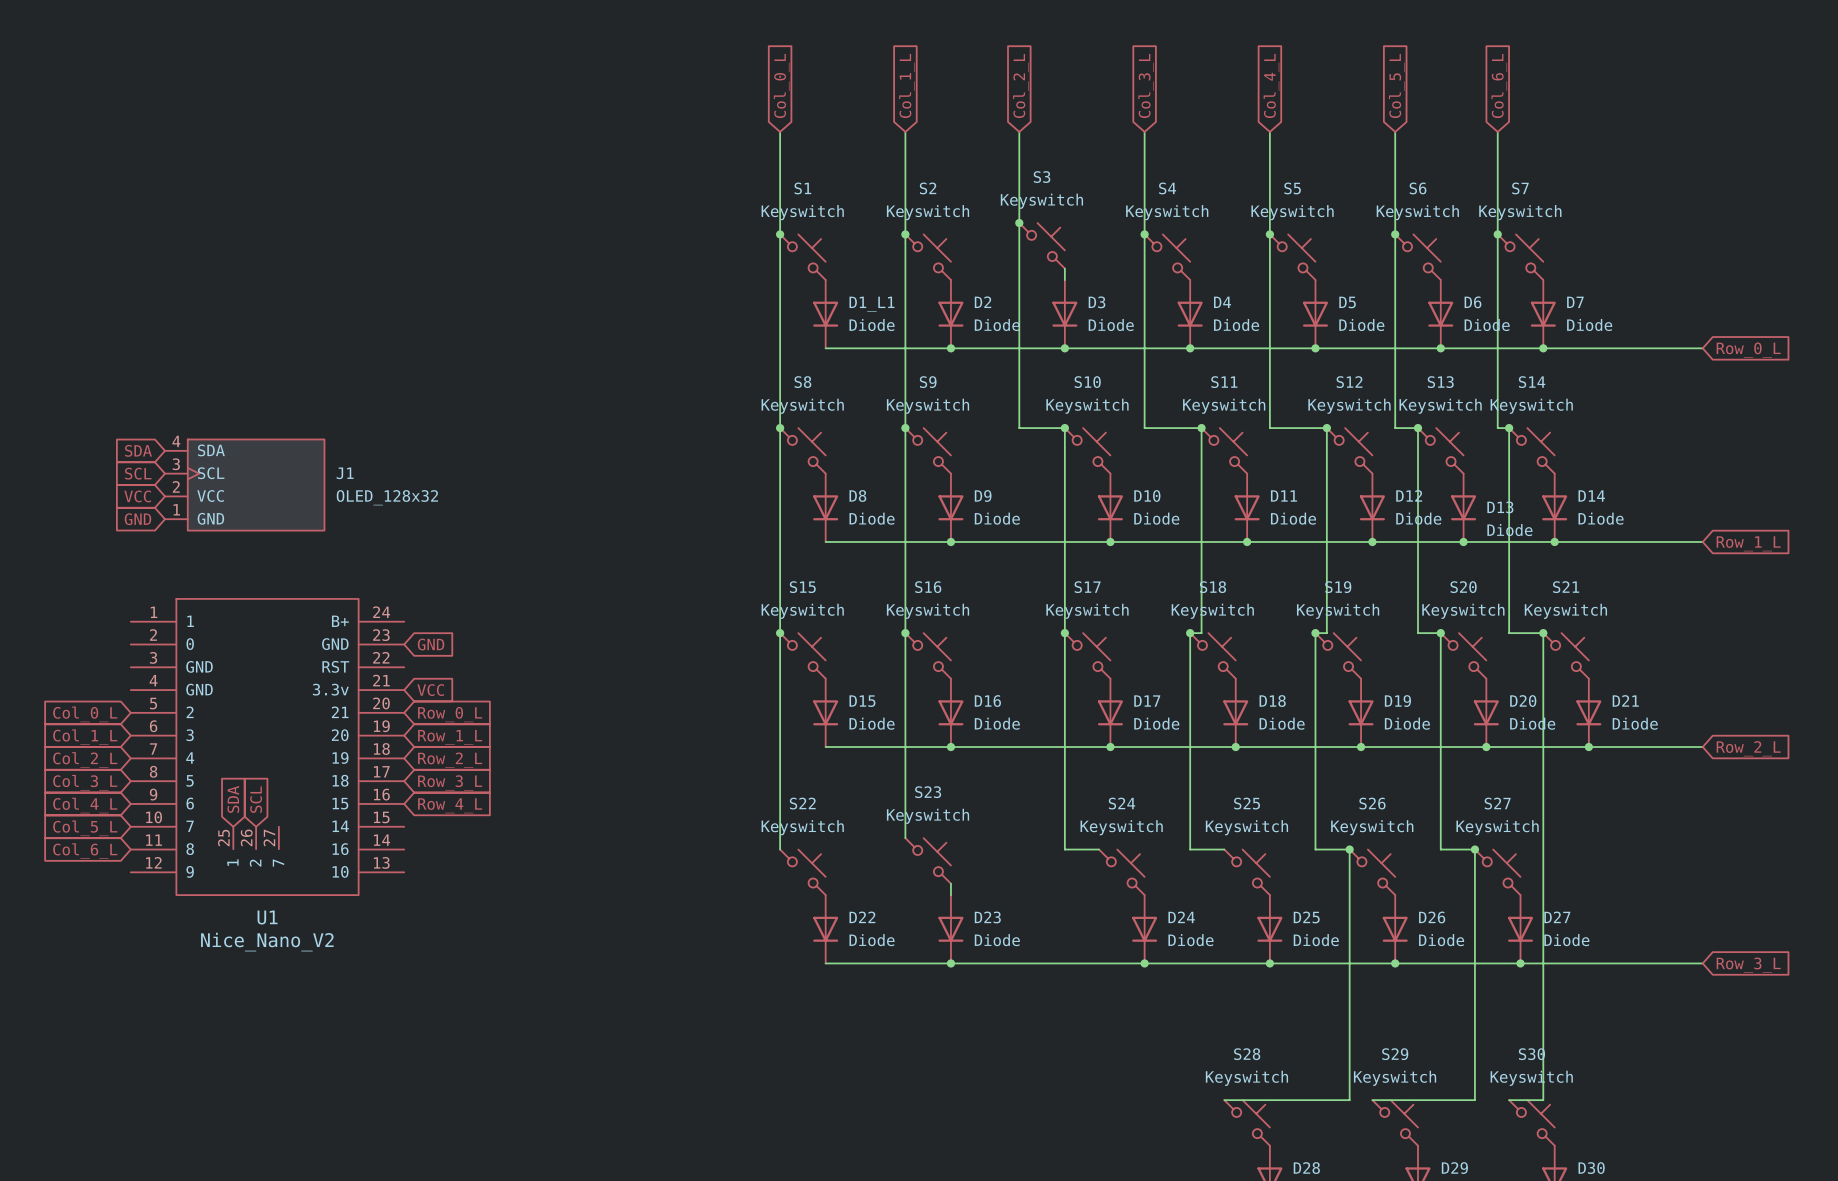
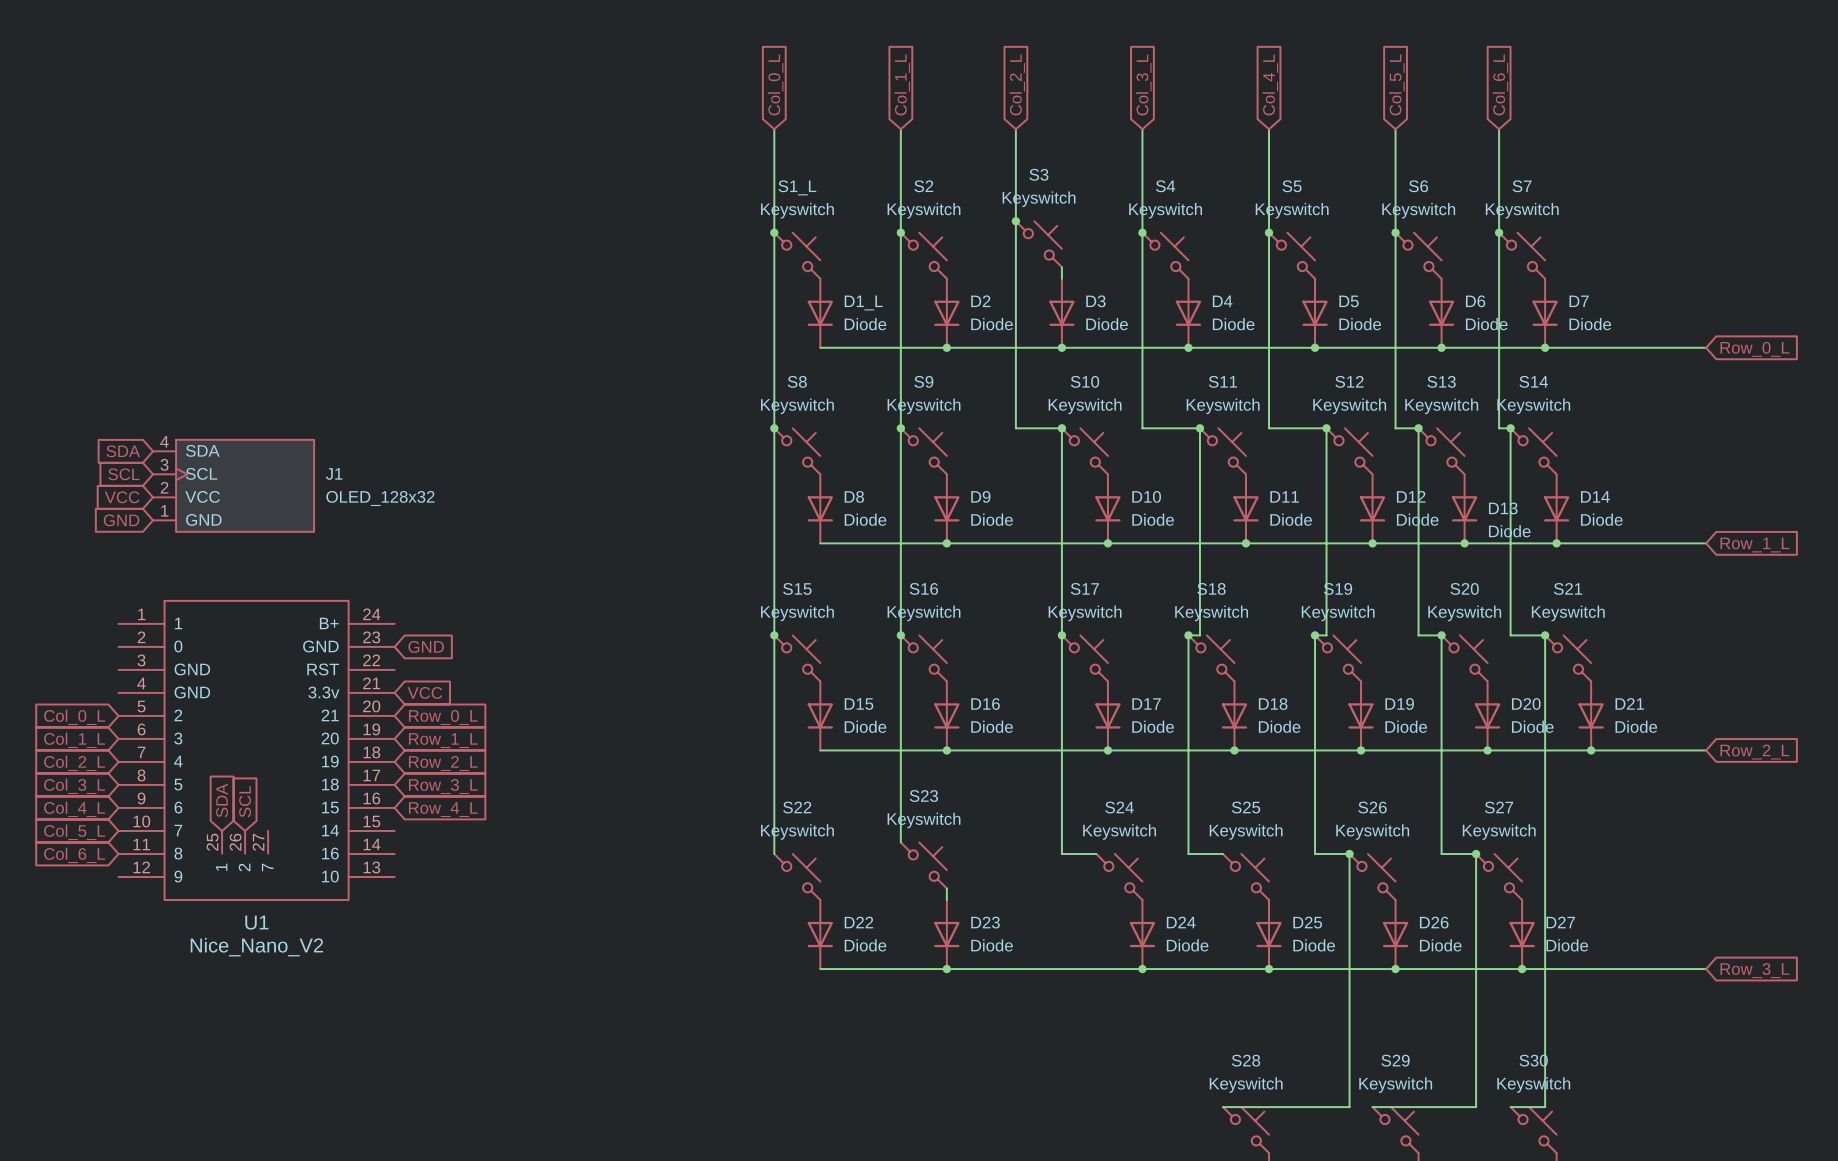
S1 name: S1 (802, 188) -> S1_L (797, 187)
D1_L1 name: D1_L1 (871, 304) -> D1_L (863, 302)

